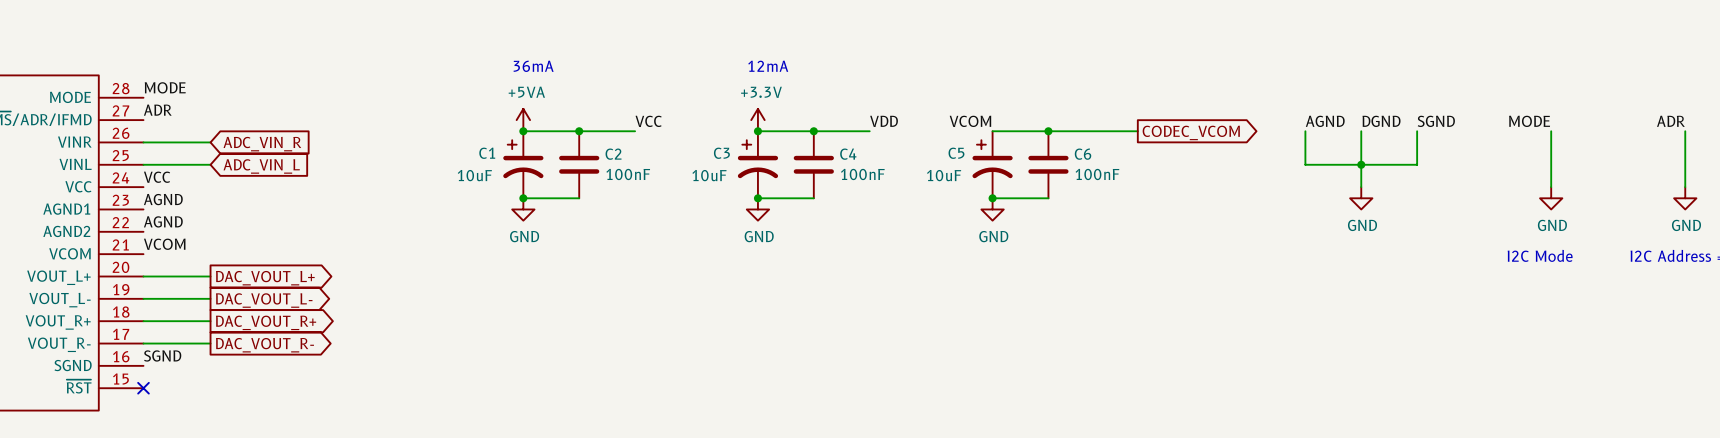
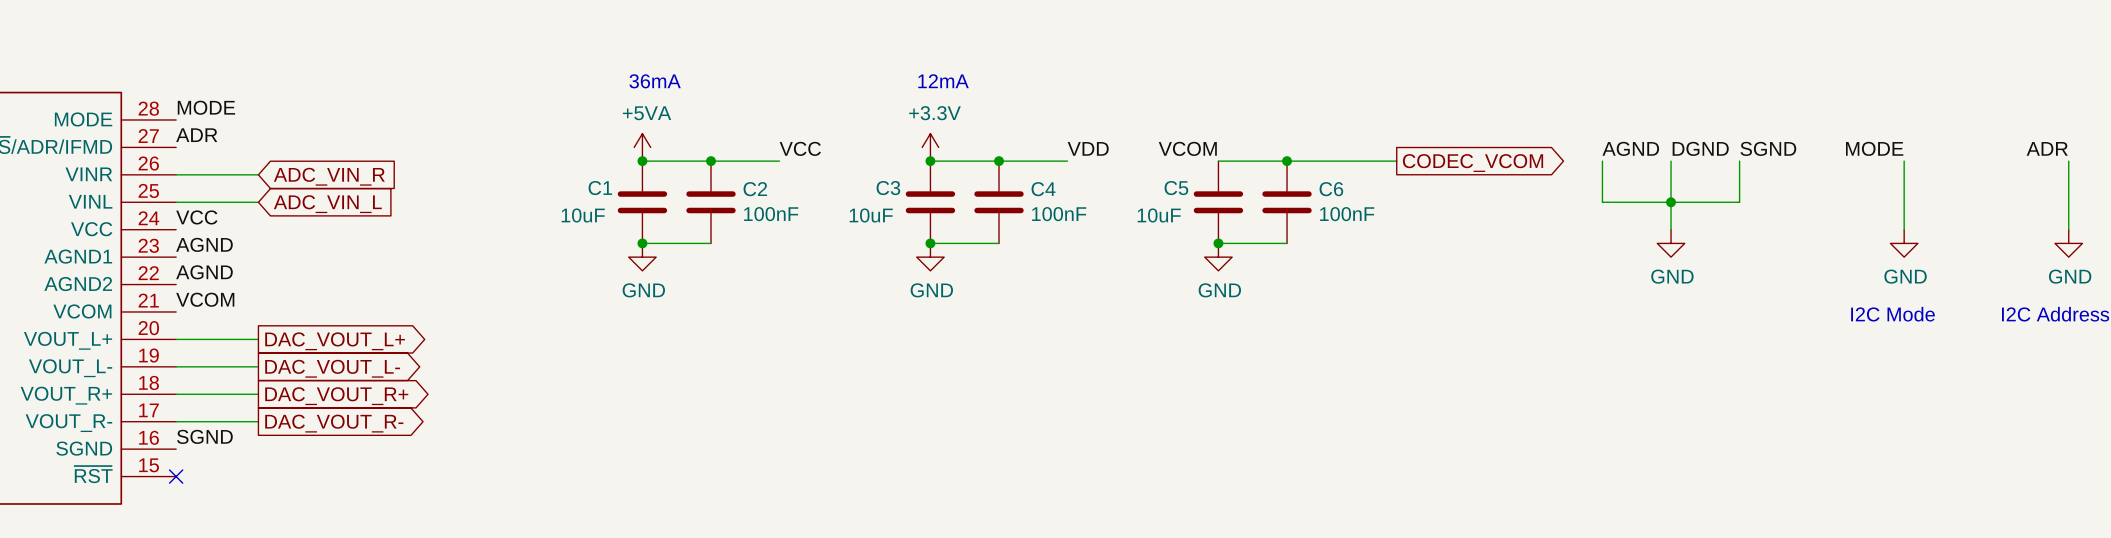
C1 symbol: [503, 131, 544, 199] -> [617, 161, 668, 244]
C3 symbol: [737, 131, 779, 199] -> [905, 161, 956, 244]
C5 symbol: [972, 131, 1013, 199] -> [1193, 161, 1244, 244]

